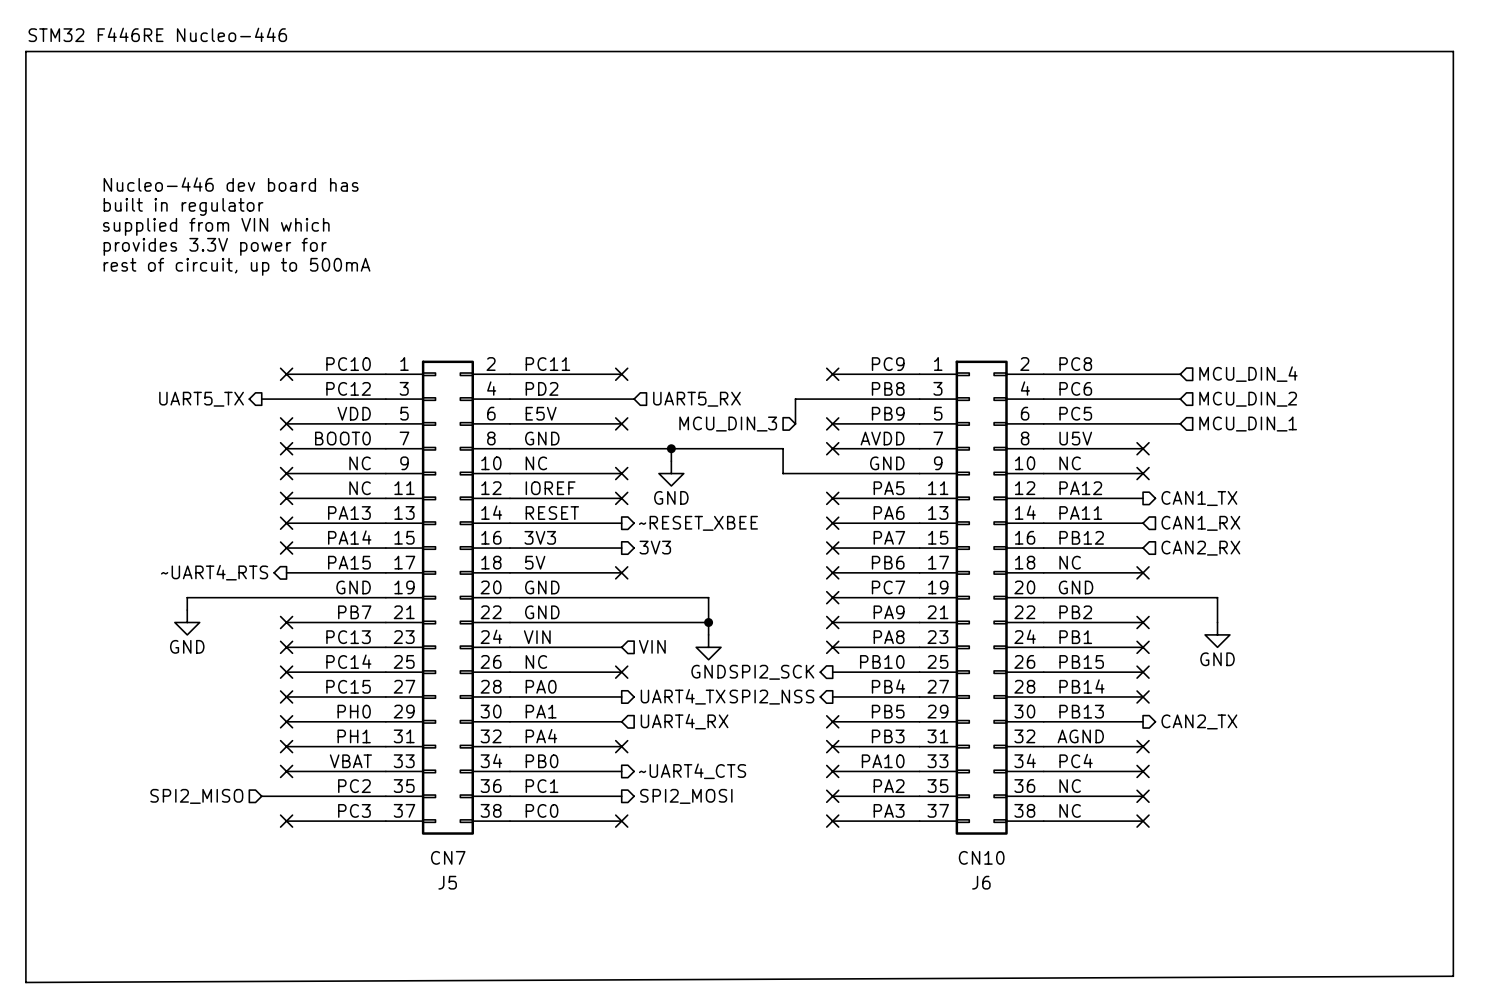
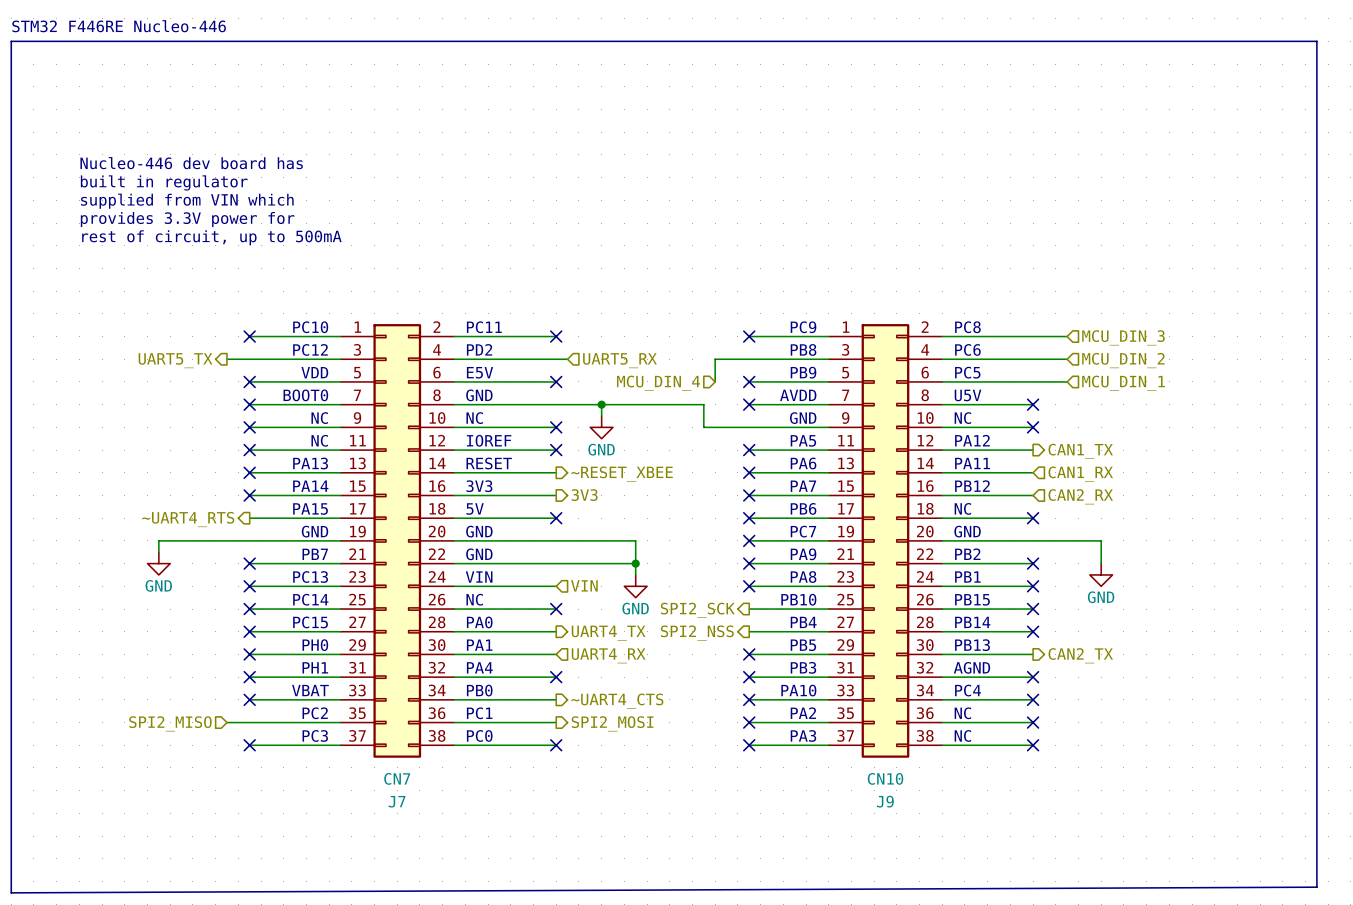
hierarchical label: MCU_DIN_4 (1248, 374) -> MCU_DIN_3 (1123, 337)
hierarchical label: MCU_DIN_3 (728, 424) -> MCU_DIN_4 (658, 383)
J5 name: J5 (447, 882) -> J7 (397, 801)
J6 name: J6 (981, 882) -> J9 (885, 801)

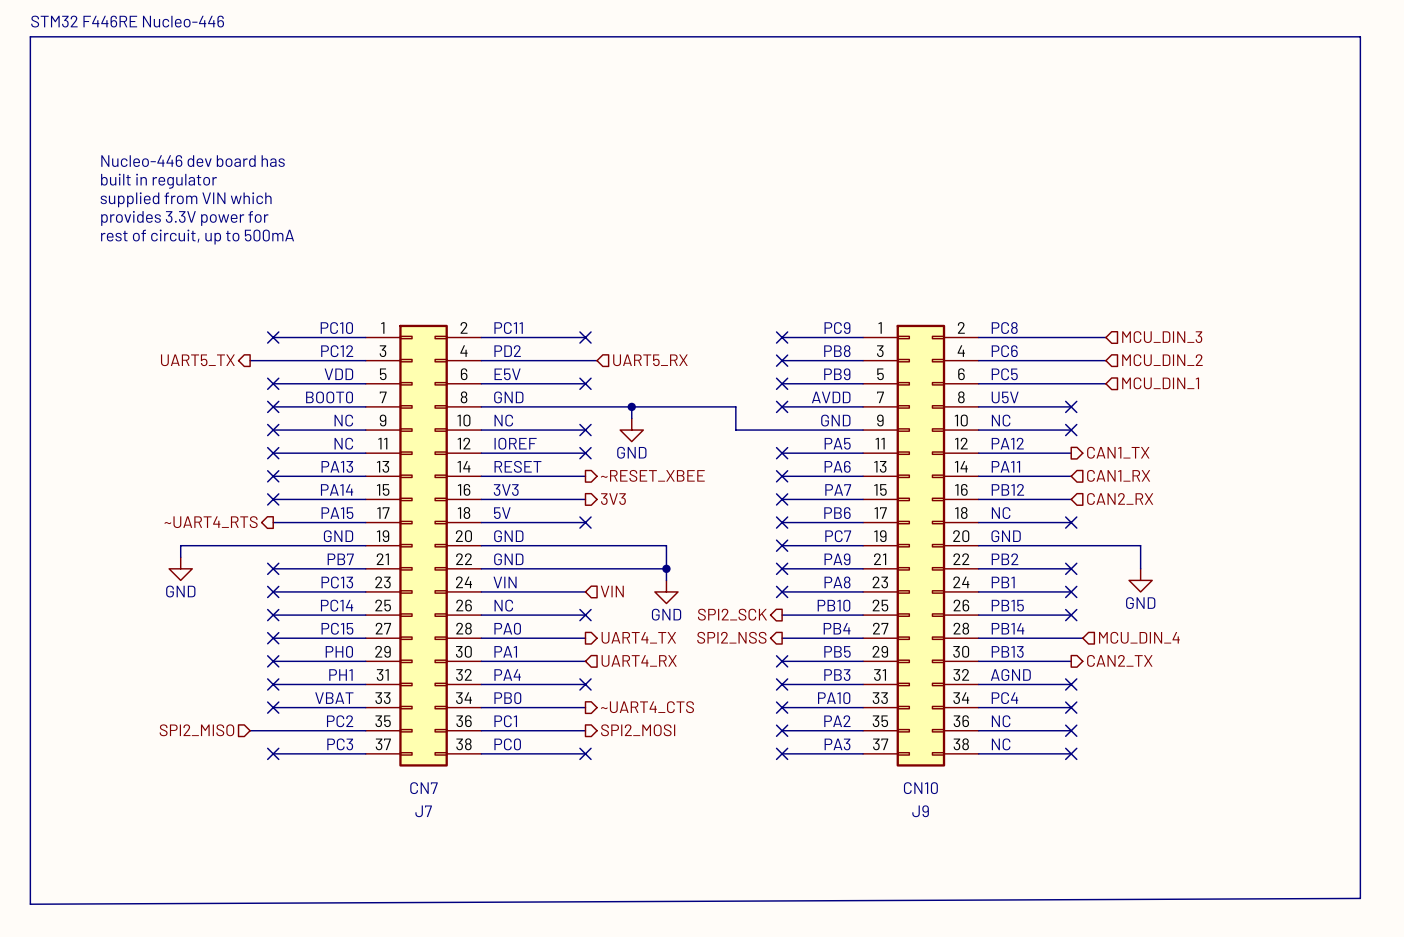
wire: (749, 359) (715, 359) (715, 381) -> none
no-connect mark: none -> (782, 360)
hierarchical label: MCU_DIN_4 (658, 383) -> none
wire: none -> (1071, 638) (1082, 638)
no-connect mark: (1033, 631) -> none
hierarchical label: none -> MCU_DIN_4 (1139, 637)

